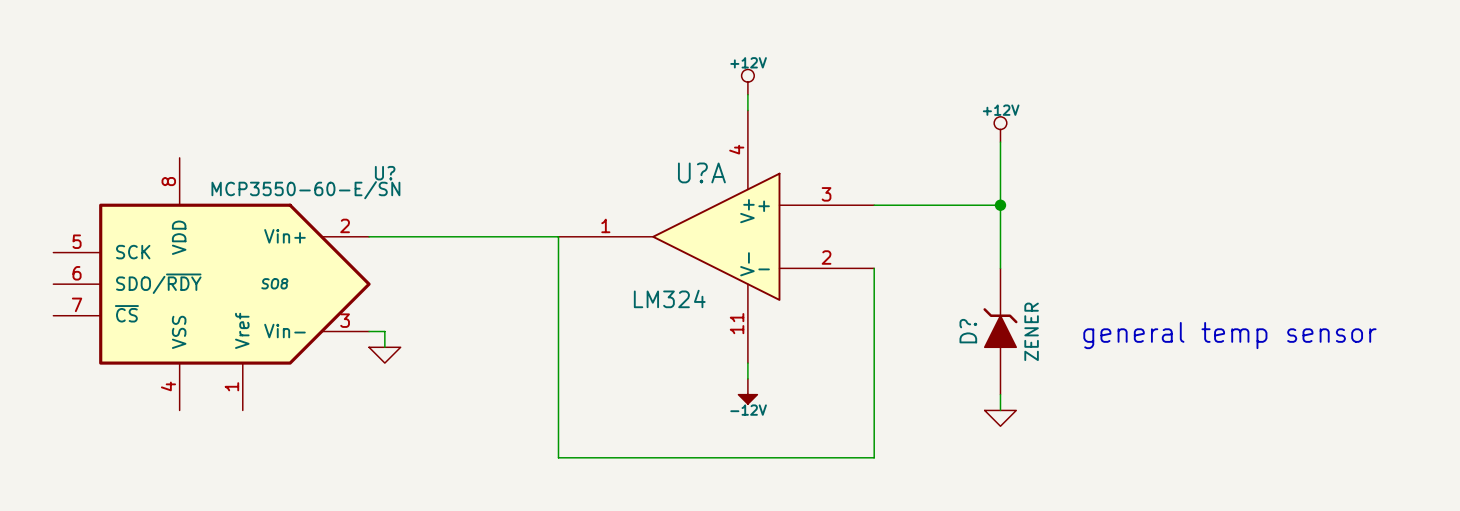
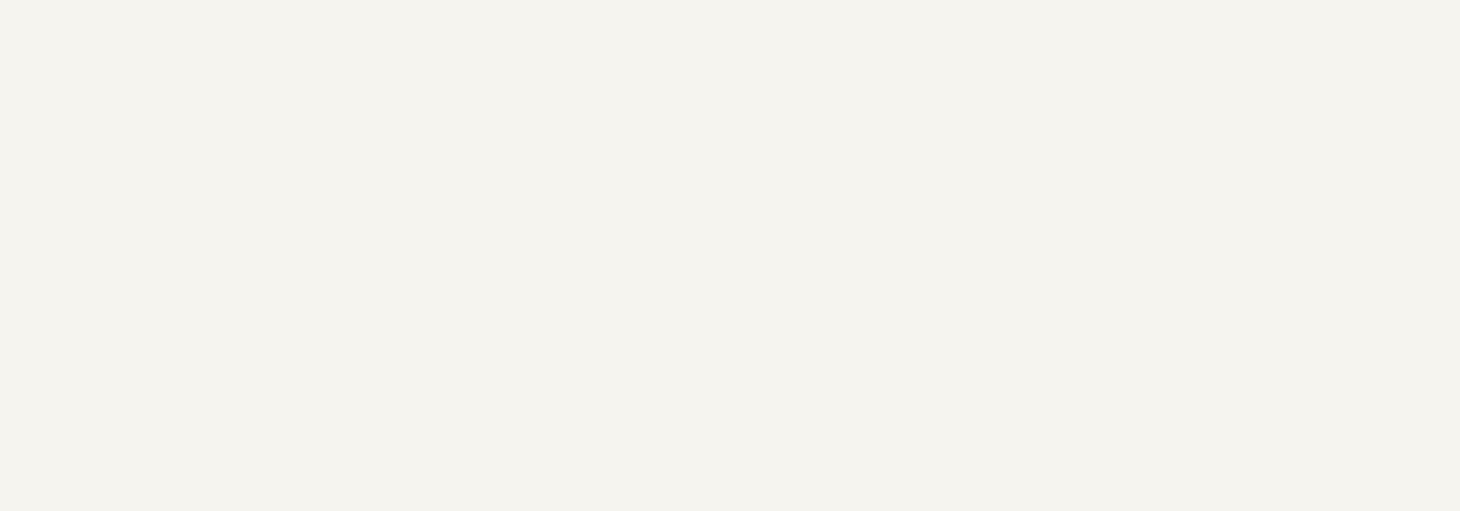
power symbol: +12V (747, 82) -> none
wire: (747, 94) (747, 110) -> none
power symbol: +12V (1000, 129) -> none
wire: (1000, 142) (1000, 268) -> none
wire: (874, 205) (1000, 205) -> none
junction: (1000, 205) -> none
wire: (369, 236) (558, 236) (558, 457) (874, 457) (874, 268) -> none
U?A: LM324 (716, 236) -> none
U?: MCP3550-60-E/SN (212, 284) -> none
wire: (369, 331) (384, 331) (384, 347) -> none
D?: ZENER (1000, 331) -> none
text: general temp sensor (1229, 335) -> none
power symbol: (384, 355) -> none
wire: (747, 363) (747, 378) -> none
power symbol: -12V (747, 391) -> none
wire: (1000, 394) (1000, 410) -> none
power symbol: (1000, 418) -> none

